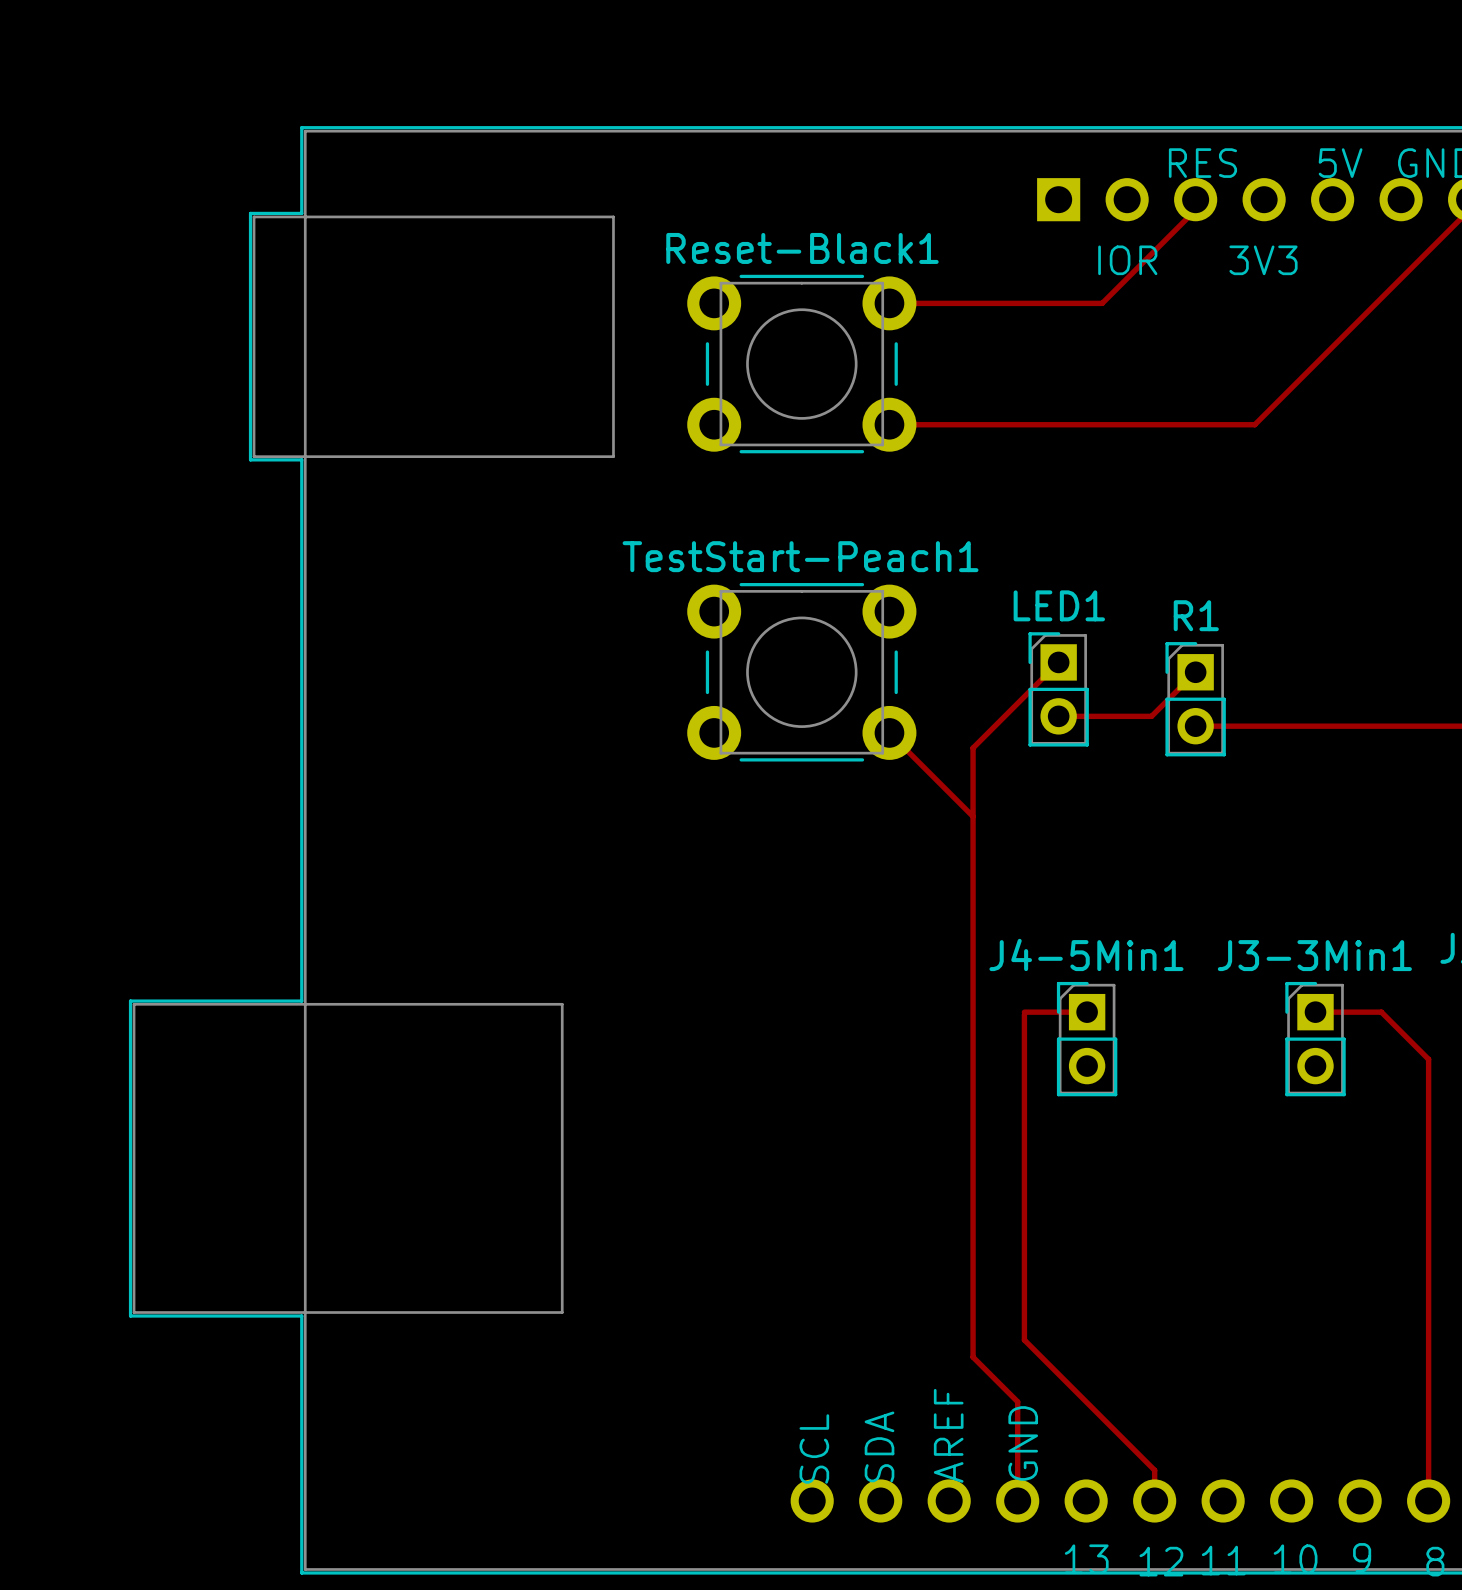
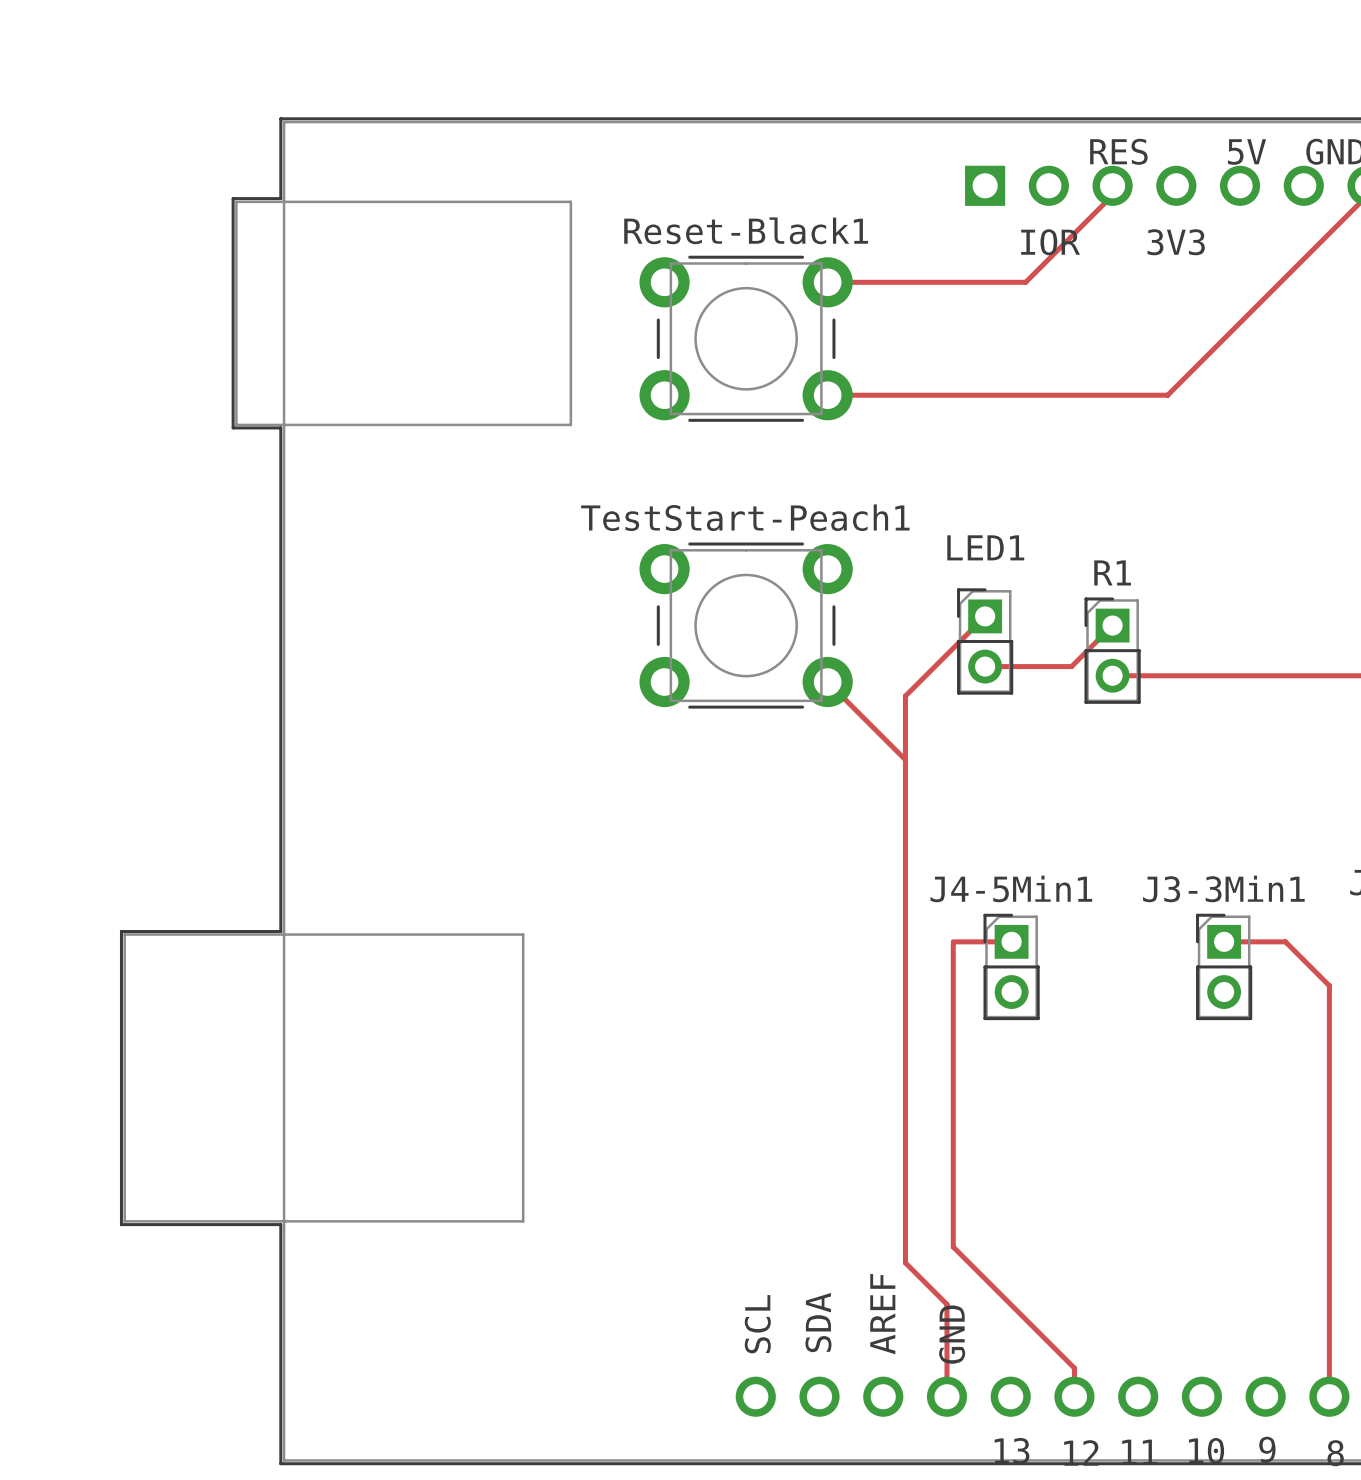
LED1 name position: LED1 (1059, 605) -> LED1 (985, 547)
text position: AREF (948, 1435) -> AREF (882, 1314)
text position: SDA (879, 1446) -> SDA (818, 1322)
text position: SCL (814, 1448) -> SCL (757, 1324)

